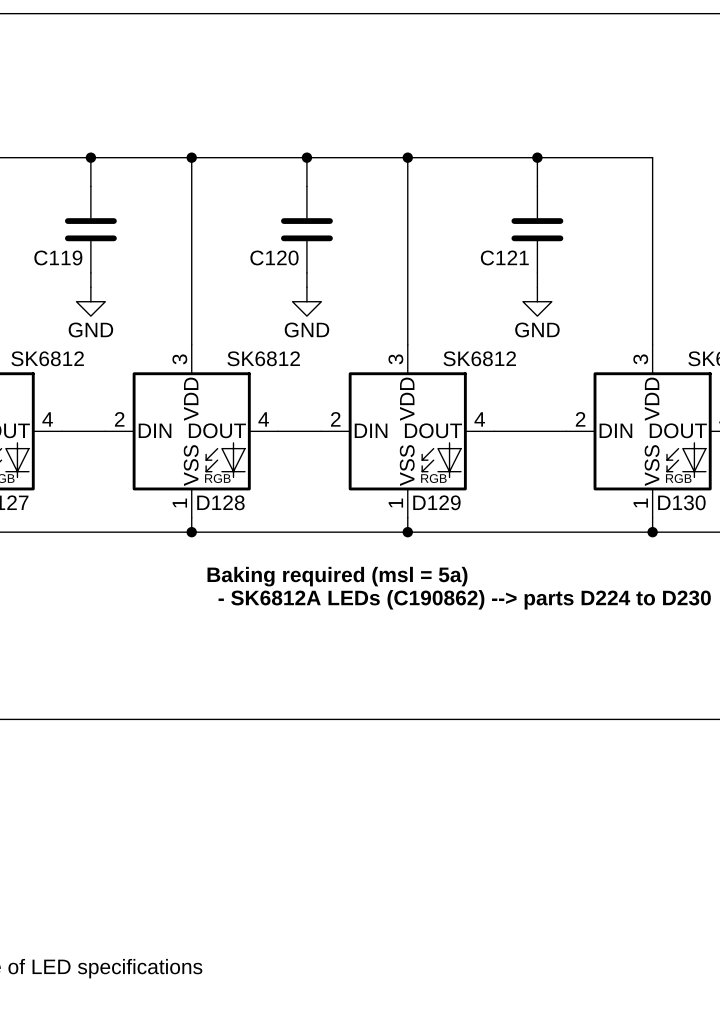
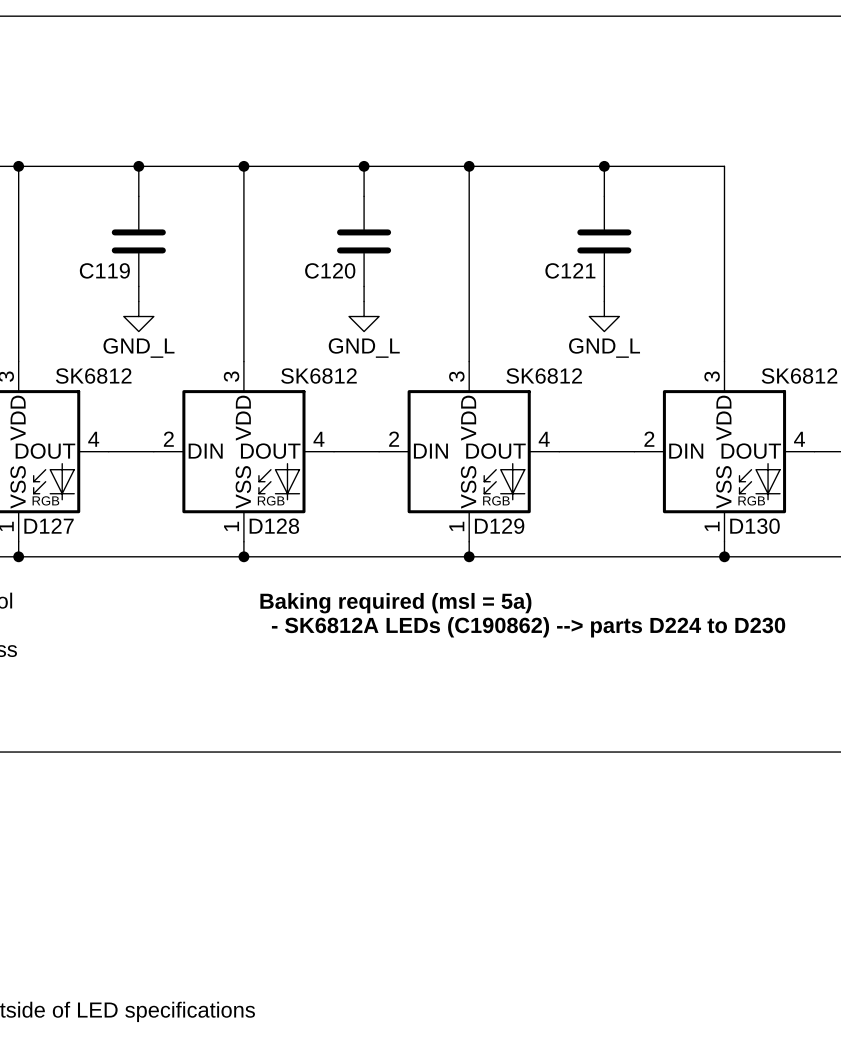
power symbol: GND (90, 301) -> GND_L (138, 316)
power symbol: GND (306, 301) -> GND_L (364, 316)
power symbol: GND (537, 301) -> GND_L (604, 316)

